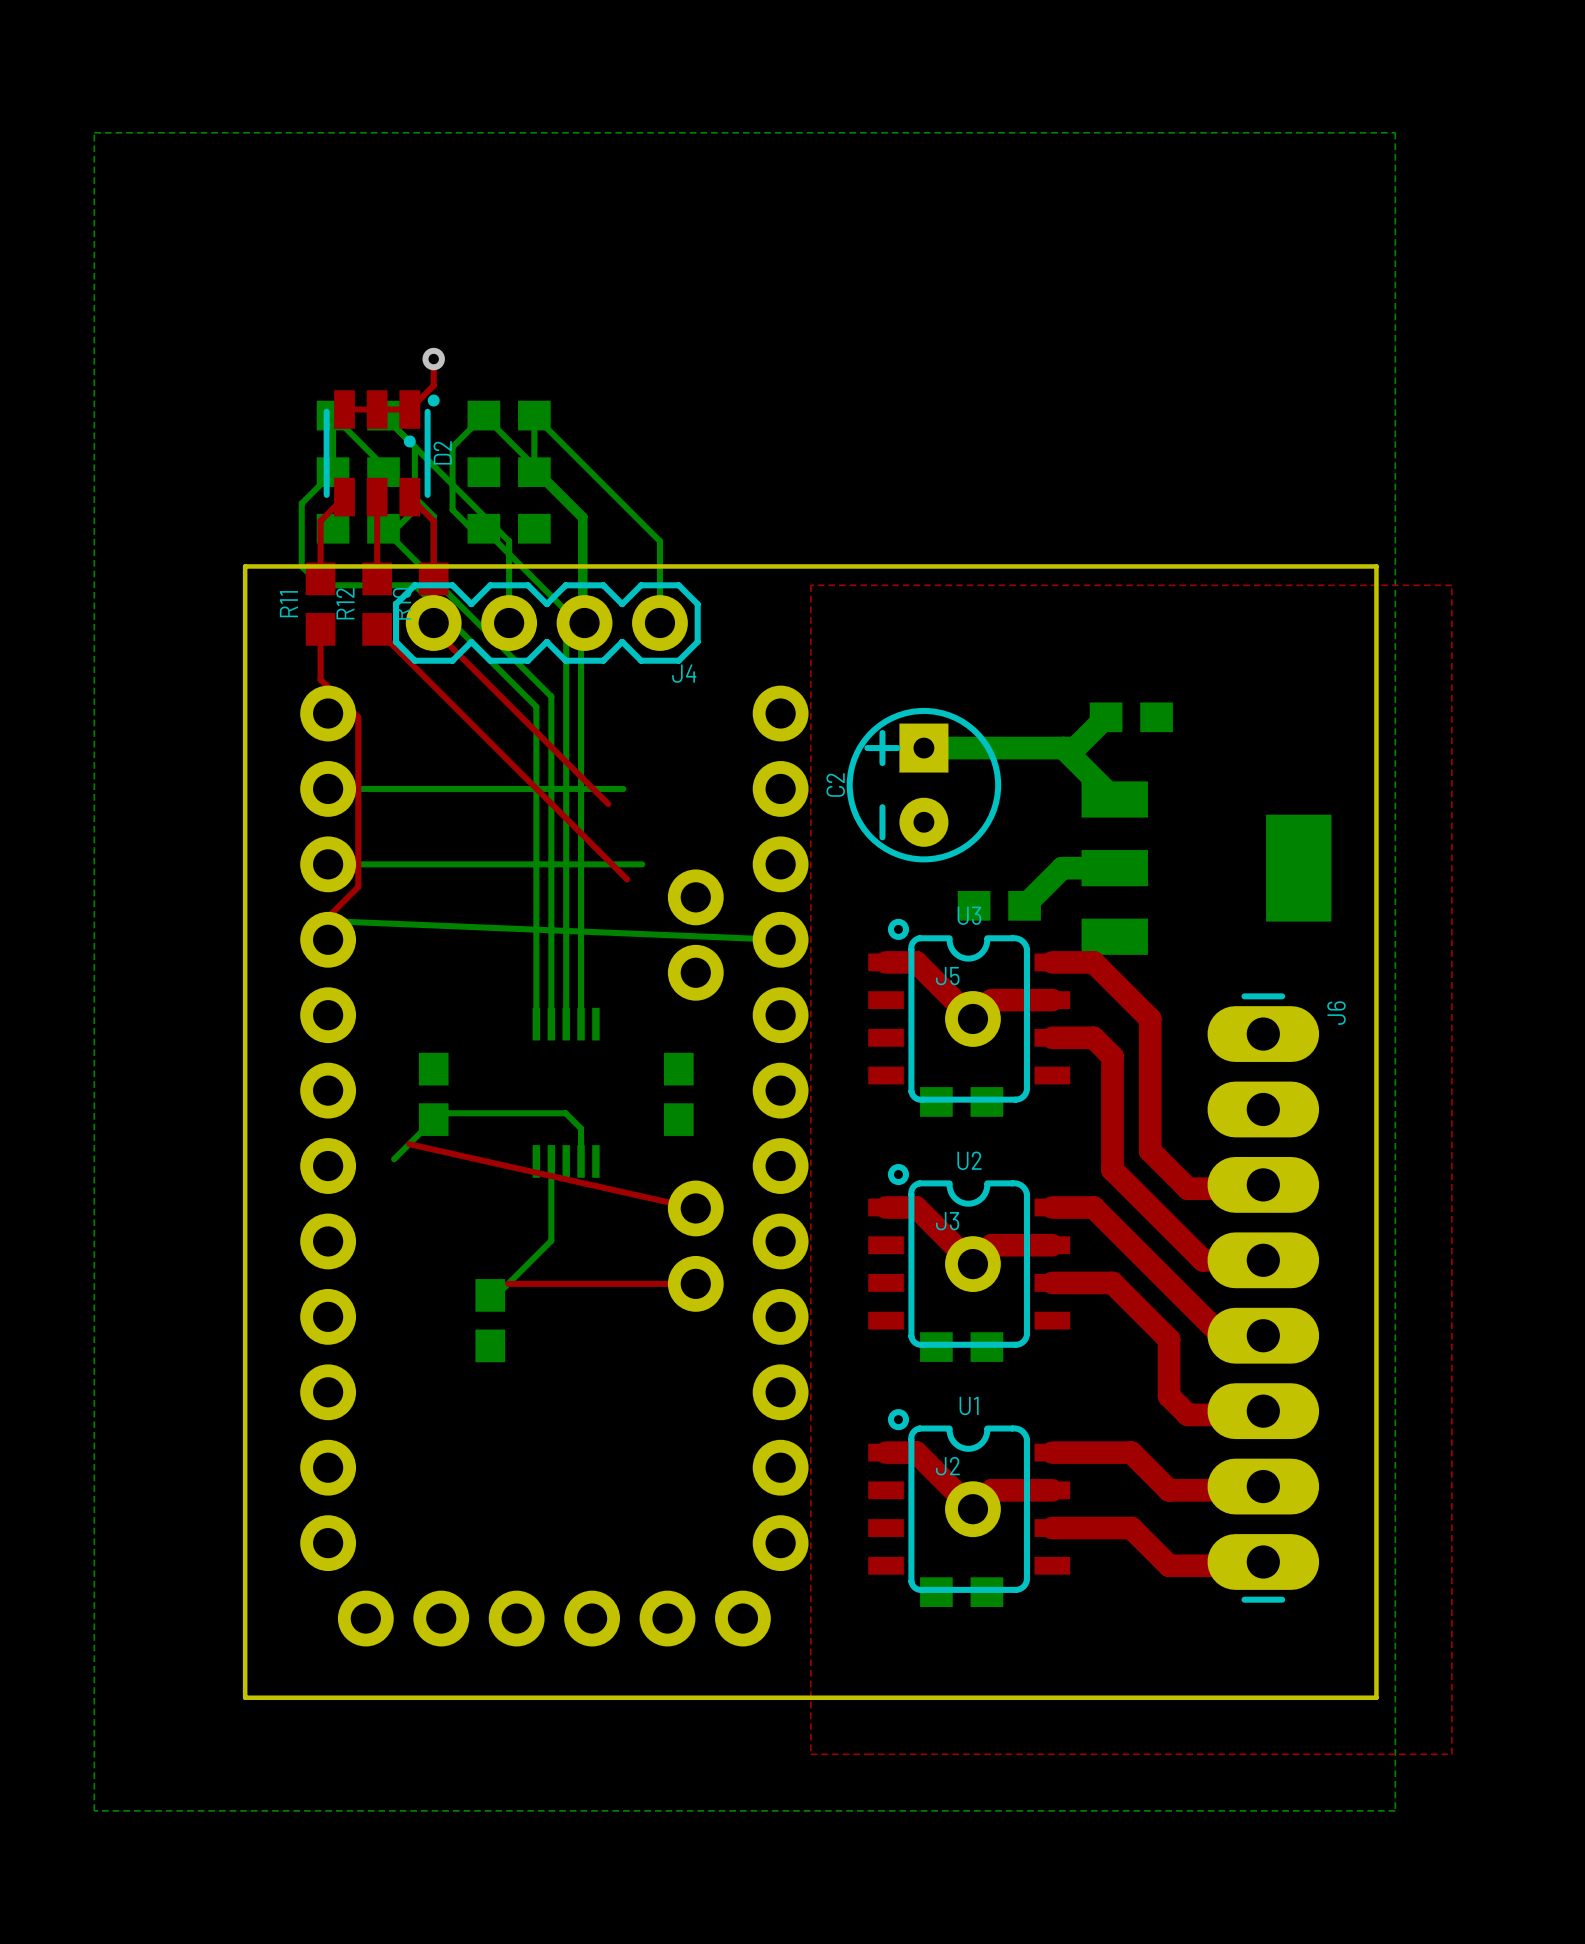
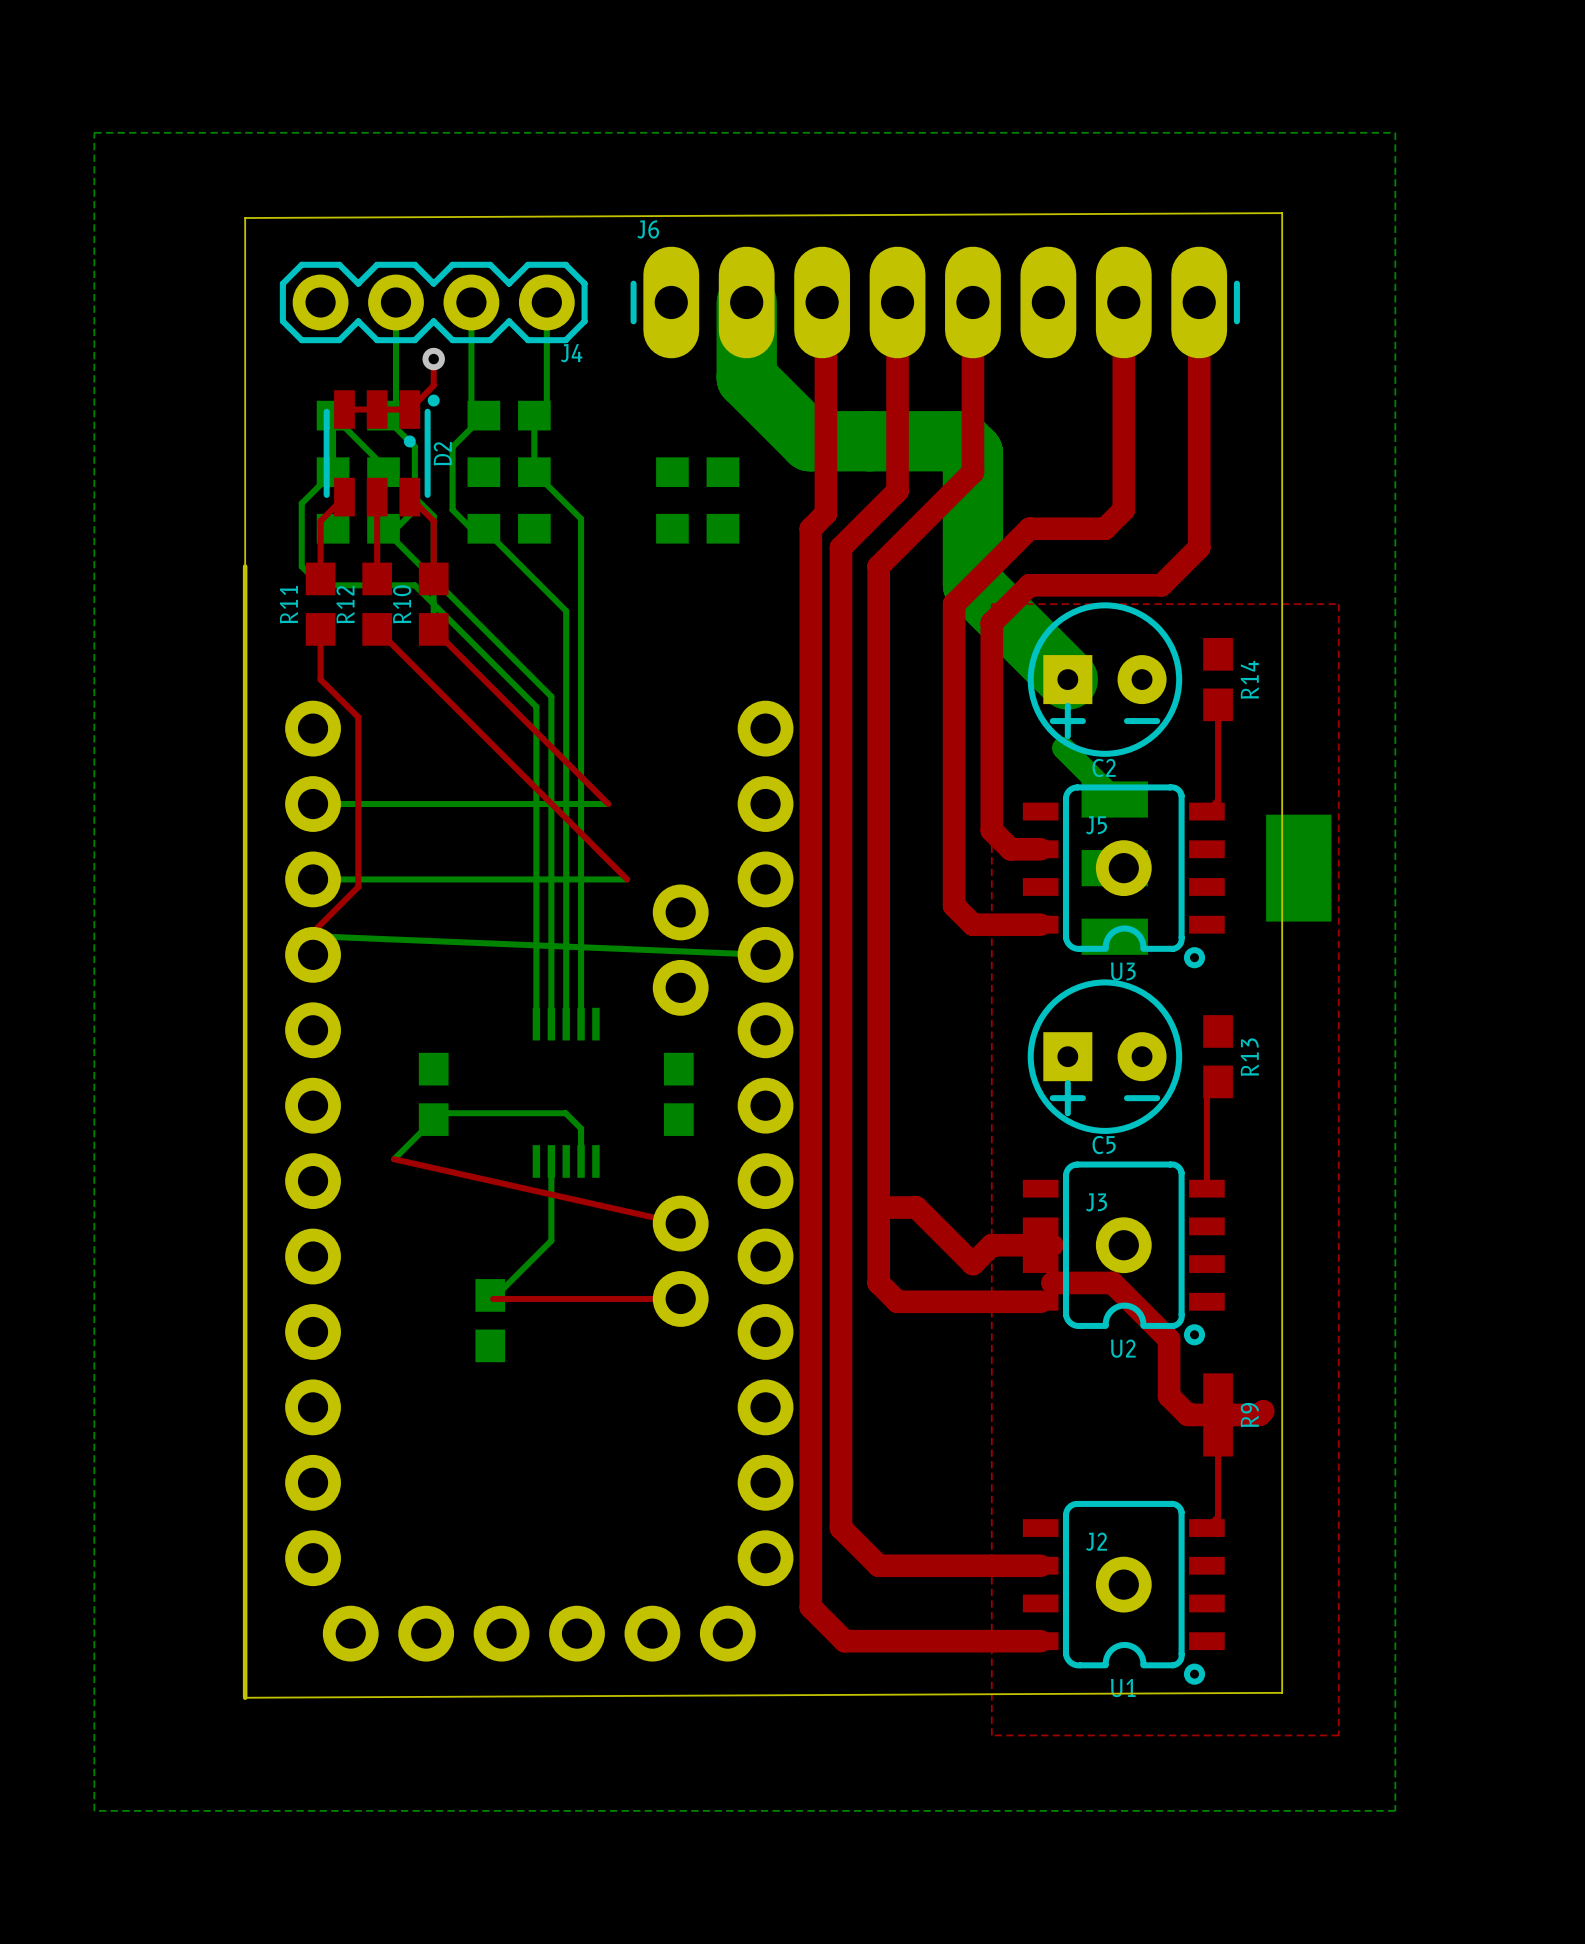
bottom track: none -> (396, 302) (396, 403) (383, 415)
bottom track: none -> (746, 302) (746, 377) (810, 441) (960, 441) (972, 453) (972, 584) (1067, 679)
top track: none -> (822, 302) (825, 306) (825, 513) (810, 528) (810, 1607) (844, 1641) (1040, 1641)
top track: none -> (897, 302) (897, 491) (840, 547) (840, 1528) (878, 1565) (1040, 1565)
top track: none -> (972, 302) (972, 472) (878, 566) (878, 1282) (897, 1301) (1040, 1301)
top track: none -> (1123, 302) (1123, 509) (1104, 528) (1029, 528) (954, 604) (954, 905) (972, 924) (1040, 924)
top track: none -> (1199, 302) (1199, 547) (1161, 585) (1029, 585) (991, 623) (991, 830) (1010, 849) (1040, 849)
bottom track: (483, 415) (584, 516) (584, 623) -> (483, 415) (471, 403) (471, 302)
bottom track: (534, 415) (659, 541) (659, 623) -> (534, 415) (546, 403) (546, 302)
bottom track: (414, 446) (509, 541) (509, 623) -> none
part: none -> (697, 472)
part: none -> (697, 528)
board edge: (245, 566) (1376, 566) (1376, 1697) (245, 1697) -> (245, 566) (245, 218) (1282, 213) (1282, 1692) (245, 1697)
top zone outline: (810, 585) (1451, 585) (1451, 1754) (810, 1754) (810, 585) -> (991, 604) (991, 1735) (1338, 1735) (1338, 604) (991, 604)
J4 position: (546, 623) -> (433, 302)
top track: none -> (1218, 704) (1218, 800) (1206, 811)
bottom track: (1106, 717) (1075, 748) (923, 748) -> none
part: (1131, 717) -> none
C2 rotation: 0° (923, 785) -> 90° counterclockwise (1104, 679)
C2 position: (923, 785) -> (1104, 679)
bottom track: (328, 788) (623, 788) -> (313, 804) (608, 804)
bottom track: (328, 864) (642, 864) -> (313, 879) (627, 879)
bottom track: (1114, 868) (1062, 868) (1024, 905) -> none
part: (999, 905) -> none
bottom track: (324, 920) (780, 939) -> (309, 936) (765, 954)
top track: (886, 962) (916, 962) (972, 1018) (991, 1000) (1052, 1000) -> none
top track: (1052, 962) (1093, 962) (1150, 1018) (1150, 1150) (1187, 1188) (1259, 1188) (1263, 1184) -> none
U3 rotation: 0° (969, 1010) -> 180° (1123, 876)
U3 position: (969, 1010) -> (1123, 876)
J6 name position: J6 (1336, 1013) -> J6 (648, 229)
J5 position: (972, 1018) -> (1123, 868)
top track: (1052, 1037) (1093, 1037) (1112, 1056) (1112, 1169) (1202, 1260) (1263, 1260) -> none
C5: none -> (1104, 1056)
top track: none -> (1218, 1081) (1206, 1093) (1206, 1188)
R14 side: bottom (961, 1101) -> top (1218, 679)
top track: (409, 1144) (695, 1208) -> (394, 1159) (680, 1223)
part position: (554, 1166) -> (539, 1181)
top track: (1052, 1207) (1093, 1207) (1221, 1335) (1263, 1335) -> none
U2 rotation: 0° (969, 1255) -> 180° (1123, 1253)
U2 position: (969, 1255) -> (1123, 1253)
J3 position: (972, 1264) -> (1123, 1245)
top track: (508, 1283) (695, 1283) -> (493, 1298) (680, 1298)
J6 rotation: 0° (1263, 1298) -> 90° clockwise (935, 302)
J6 position: (1263, 1298) -> (935, 302)
R13 side: bottom (961, 1347) -> top (1218, 1056)
top track: none -> (1218, 1440) (1218, 1516) (1206, 1528)
top track: (886, 1452) (916, 1452) (972, 1509) (991, 1490) (1052, 1490) -> none
top track: (1052, 1452) (1131, 1452) (1169, 1490) (1259, 1490) (1263, 1486) -> none
U1 rotation: 0° (969, 1501) -> 180° (1123, 1592)
U1 position: (969, 1501) -> (1123, 1592)
J2 position: (972, 1509) -> (1123, 1584)
top track: (1052, 1528) (1131, 1528) (1169, 1565) (1259, 1565) (1263, 1561) -> none
R9 side: bottom (961, 1592) -> top (1218, 1414)

